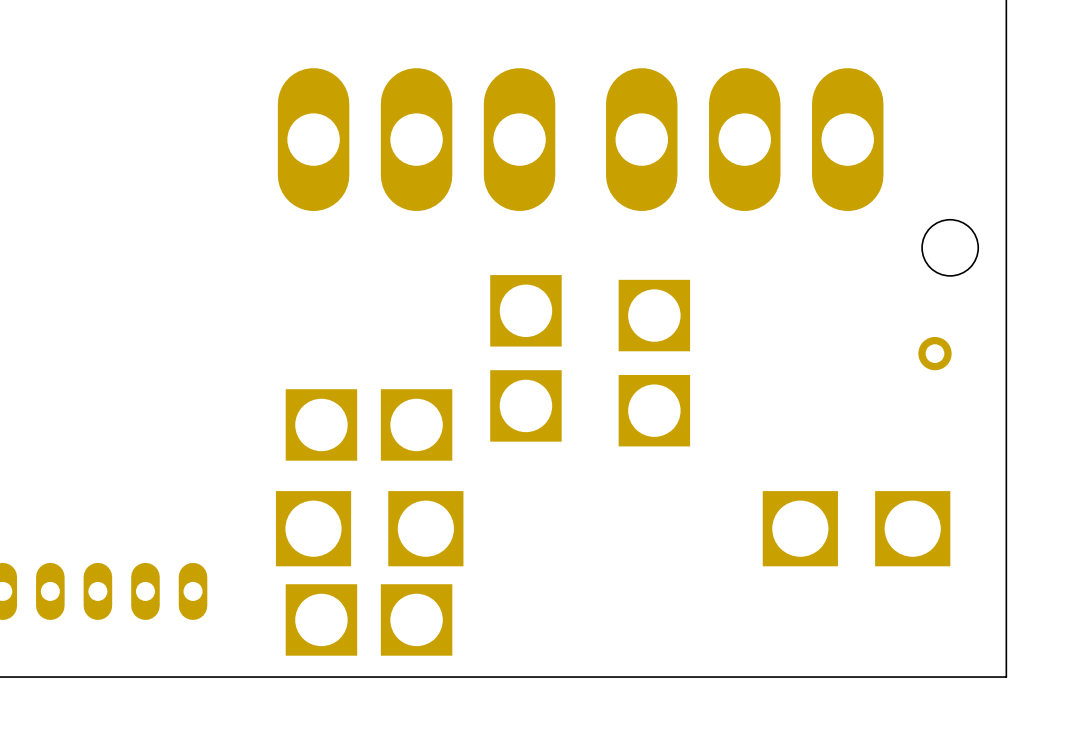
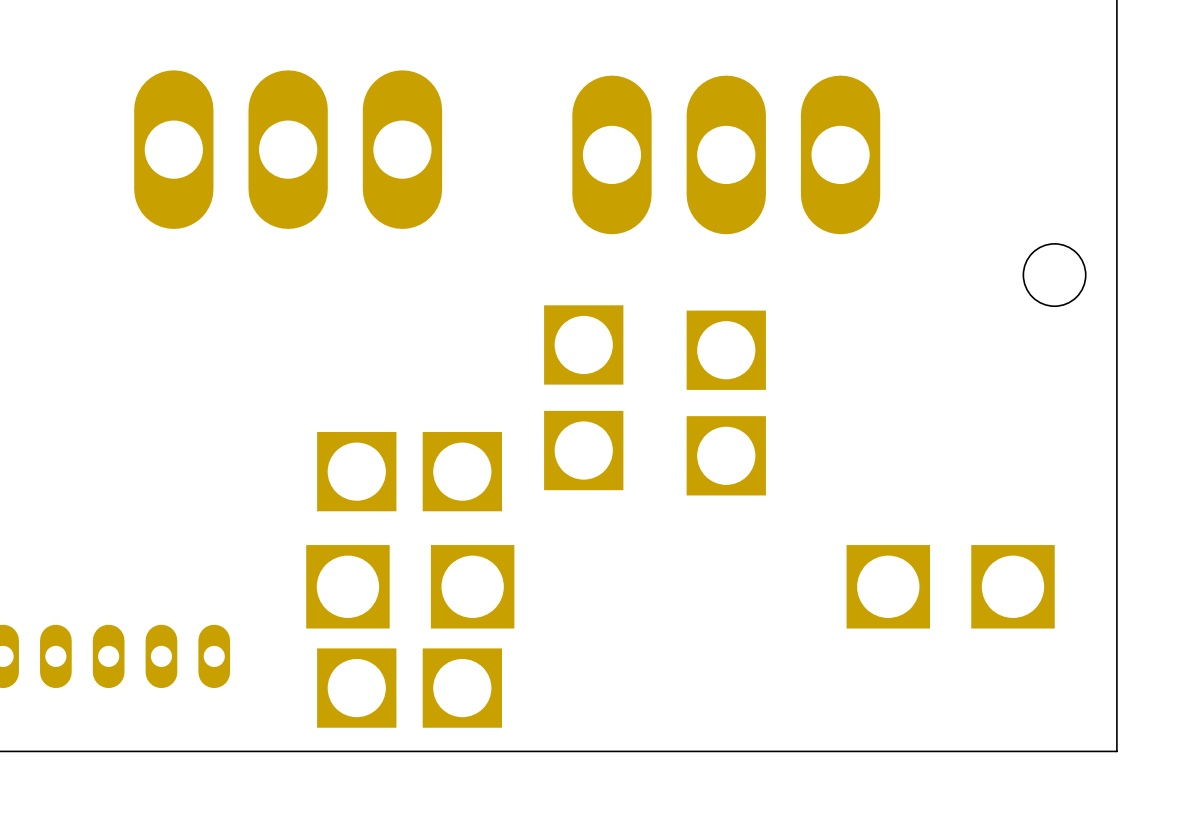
part: none -> (288, 149)
part: (416, 139) -> none
part position: (744, 139) -> (726, 154)
part: (934, 353) -> none

